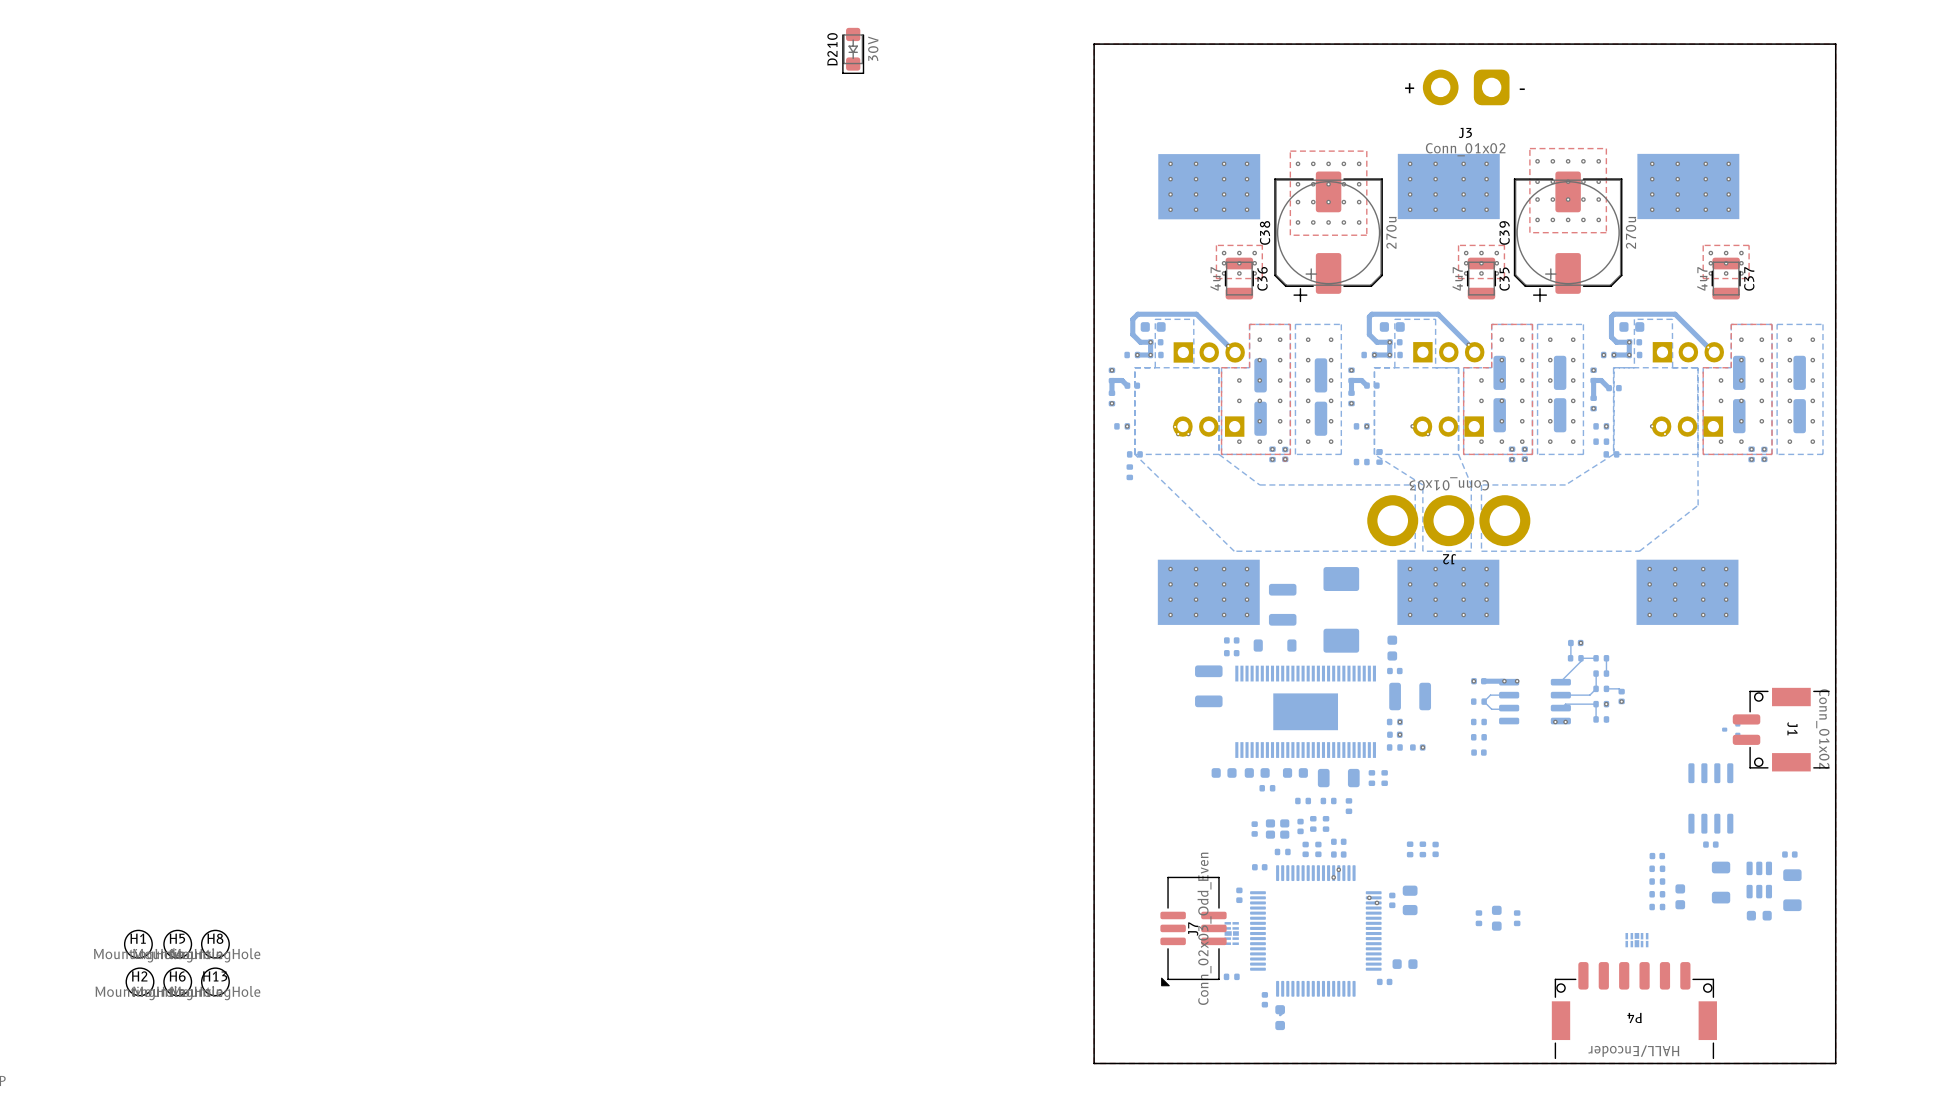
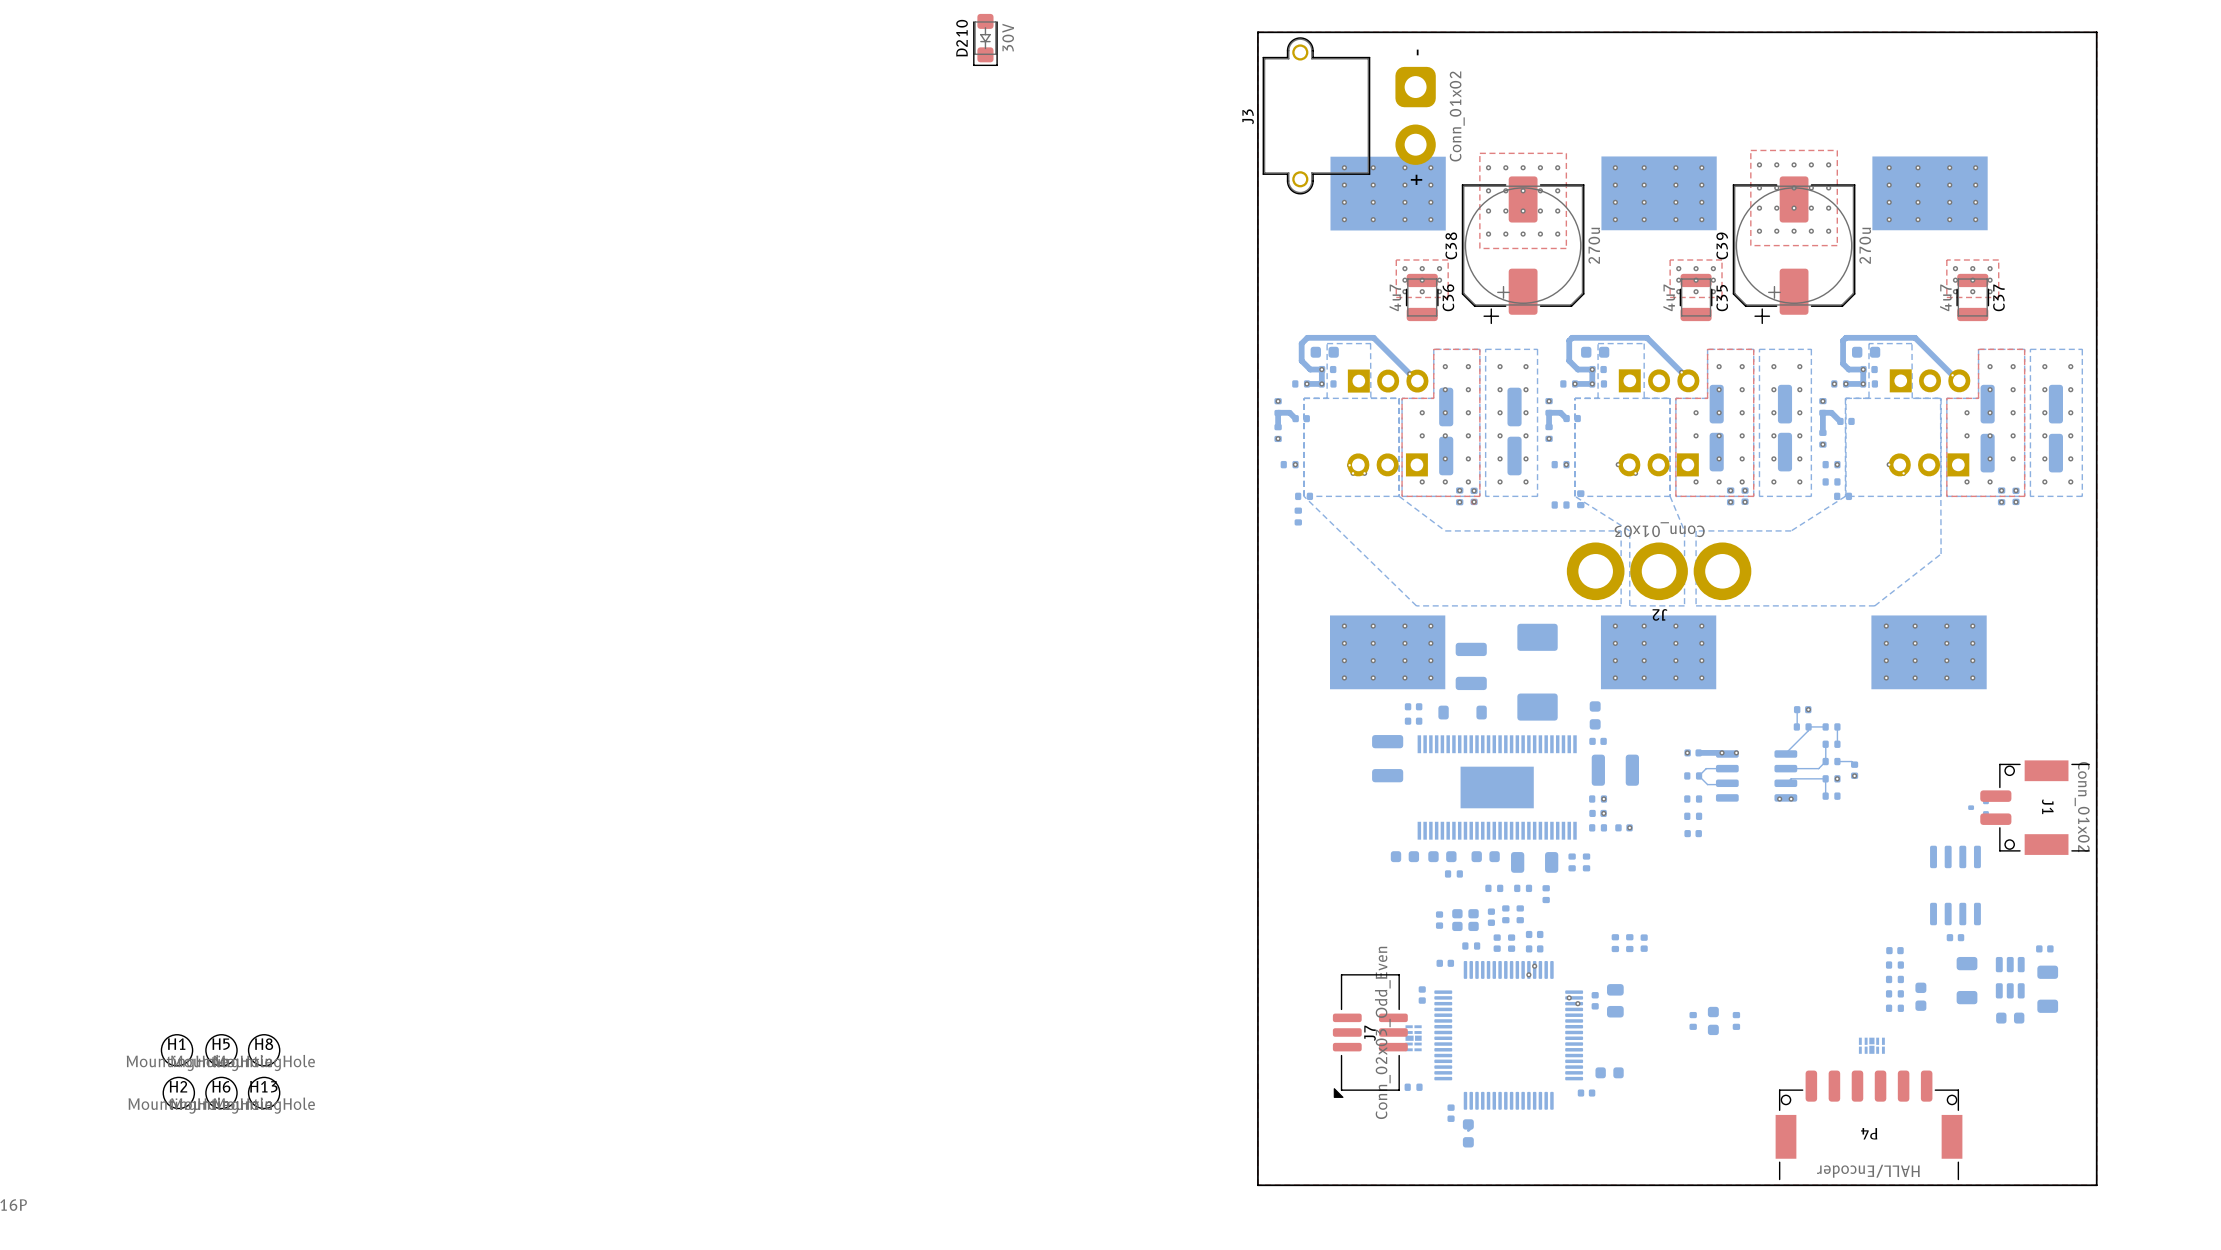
J3 footprint: [1422, 69, 1510, 106] -> [1262, 37, 1436, 195]
J3 name position: J3 (1465, 132) -> J3 (1248, 116)
J3 value position: Conn_01x02 (1465, 149) -> Conn_01x02 (1457, 116)

